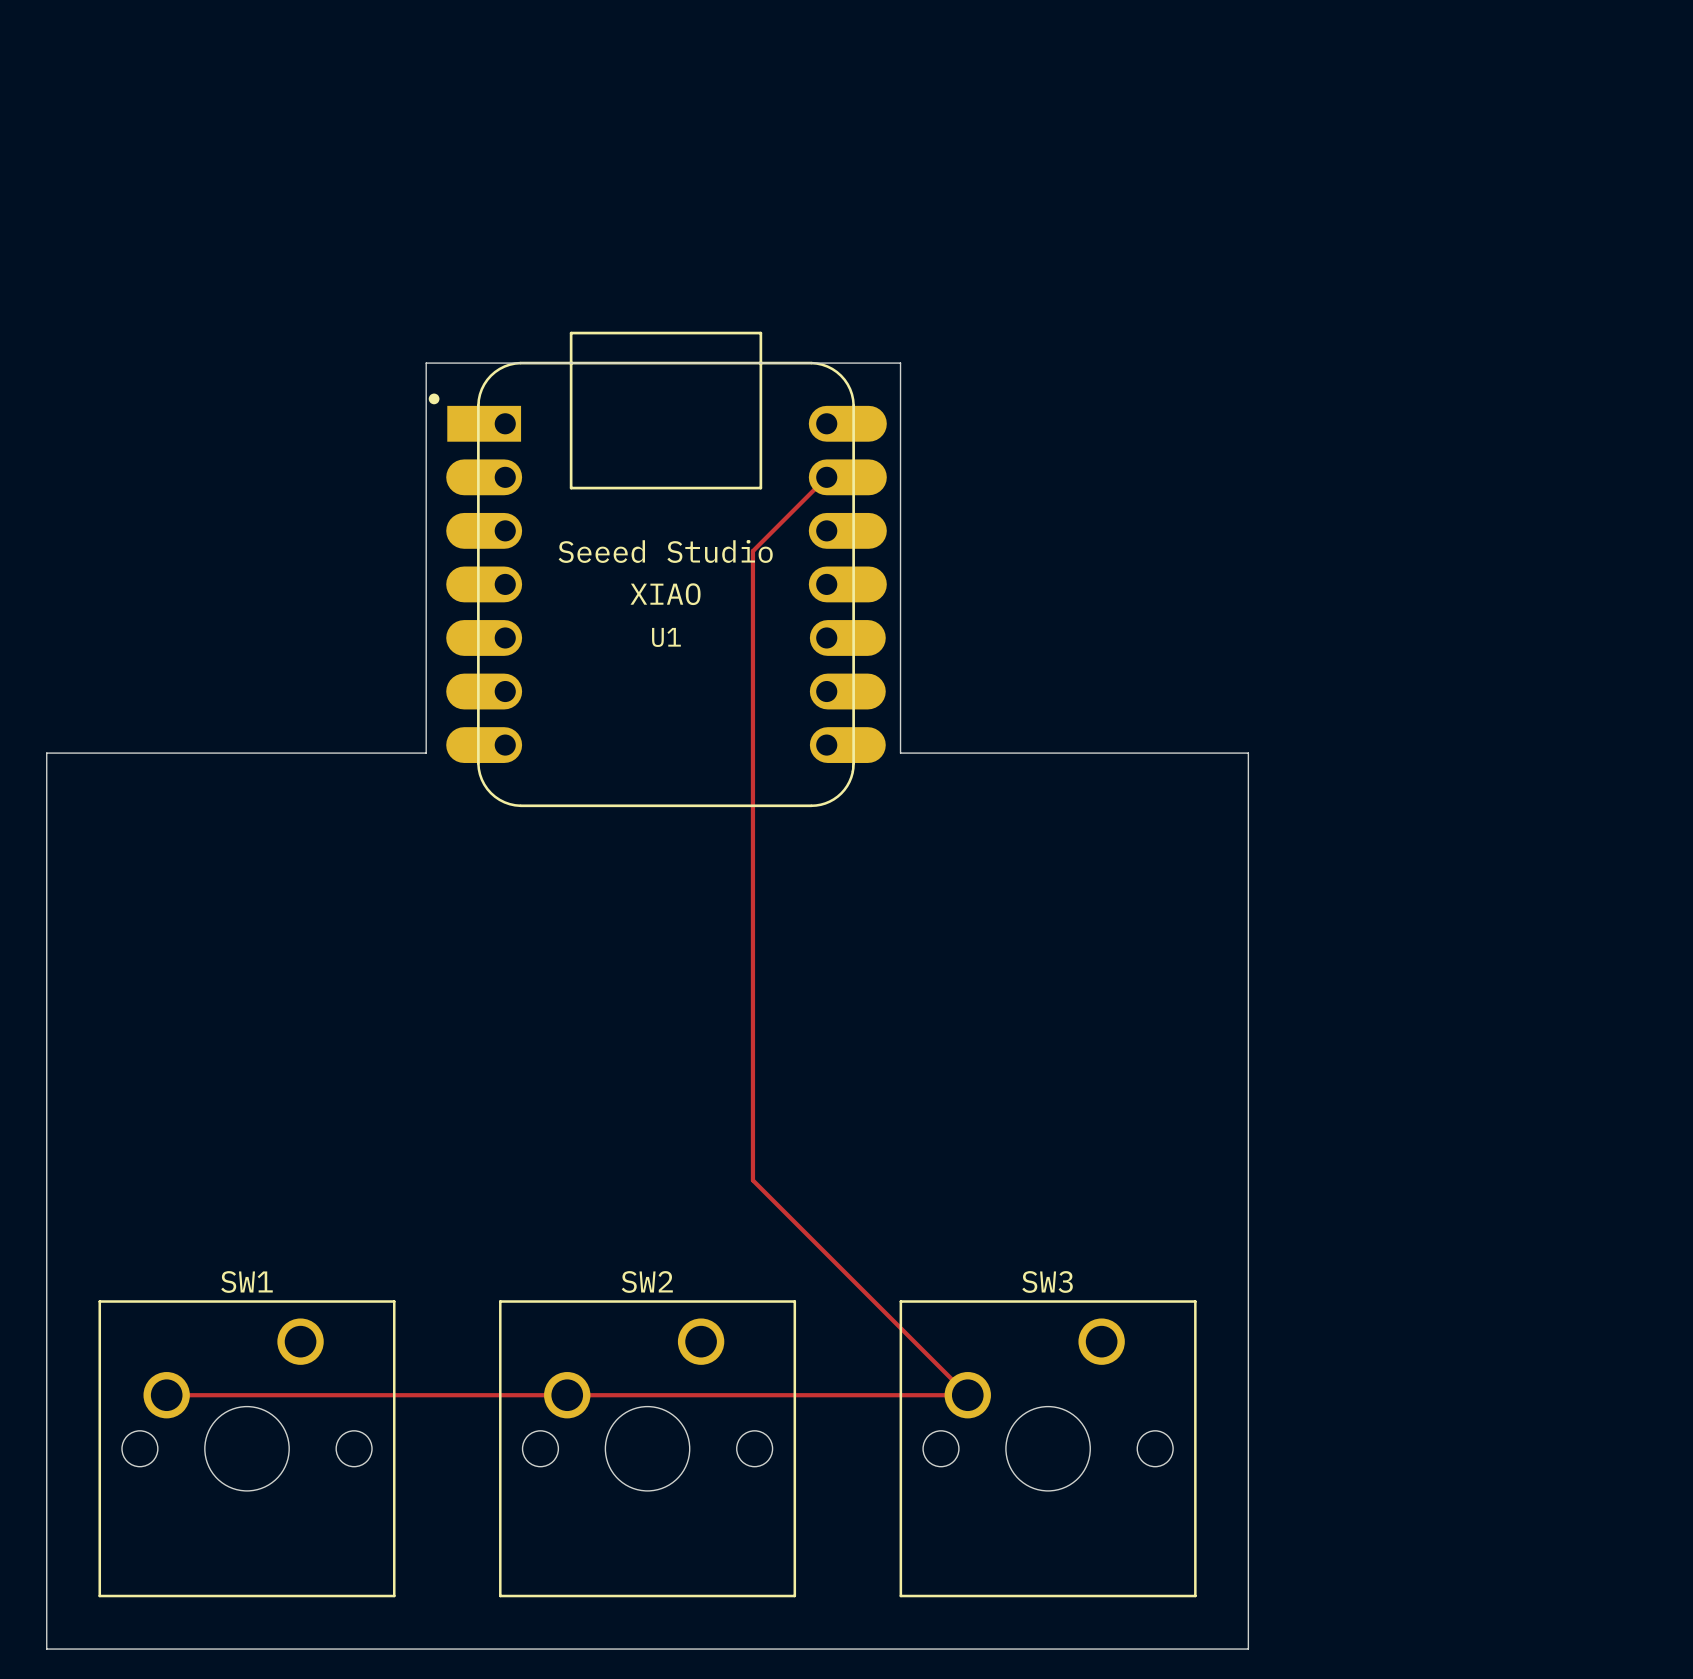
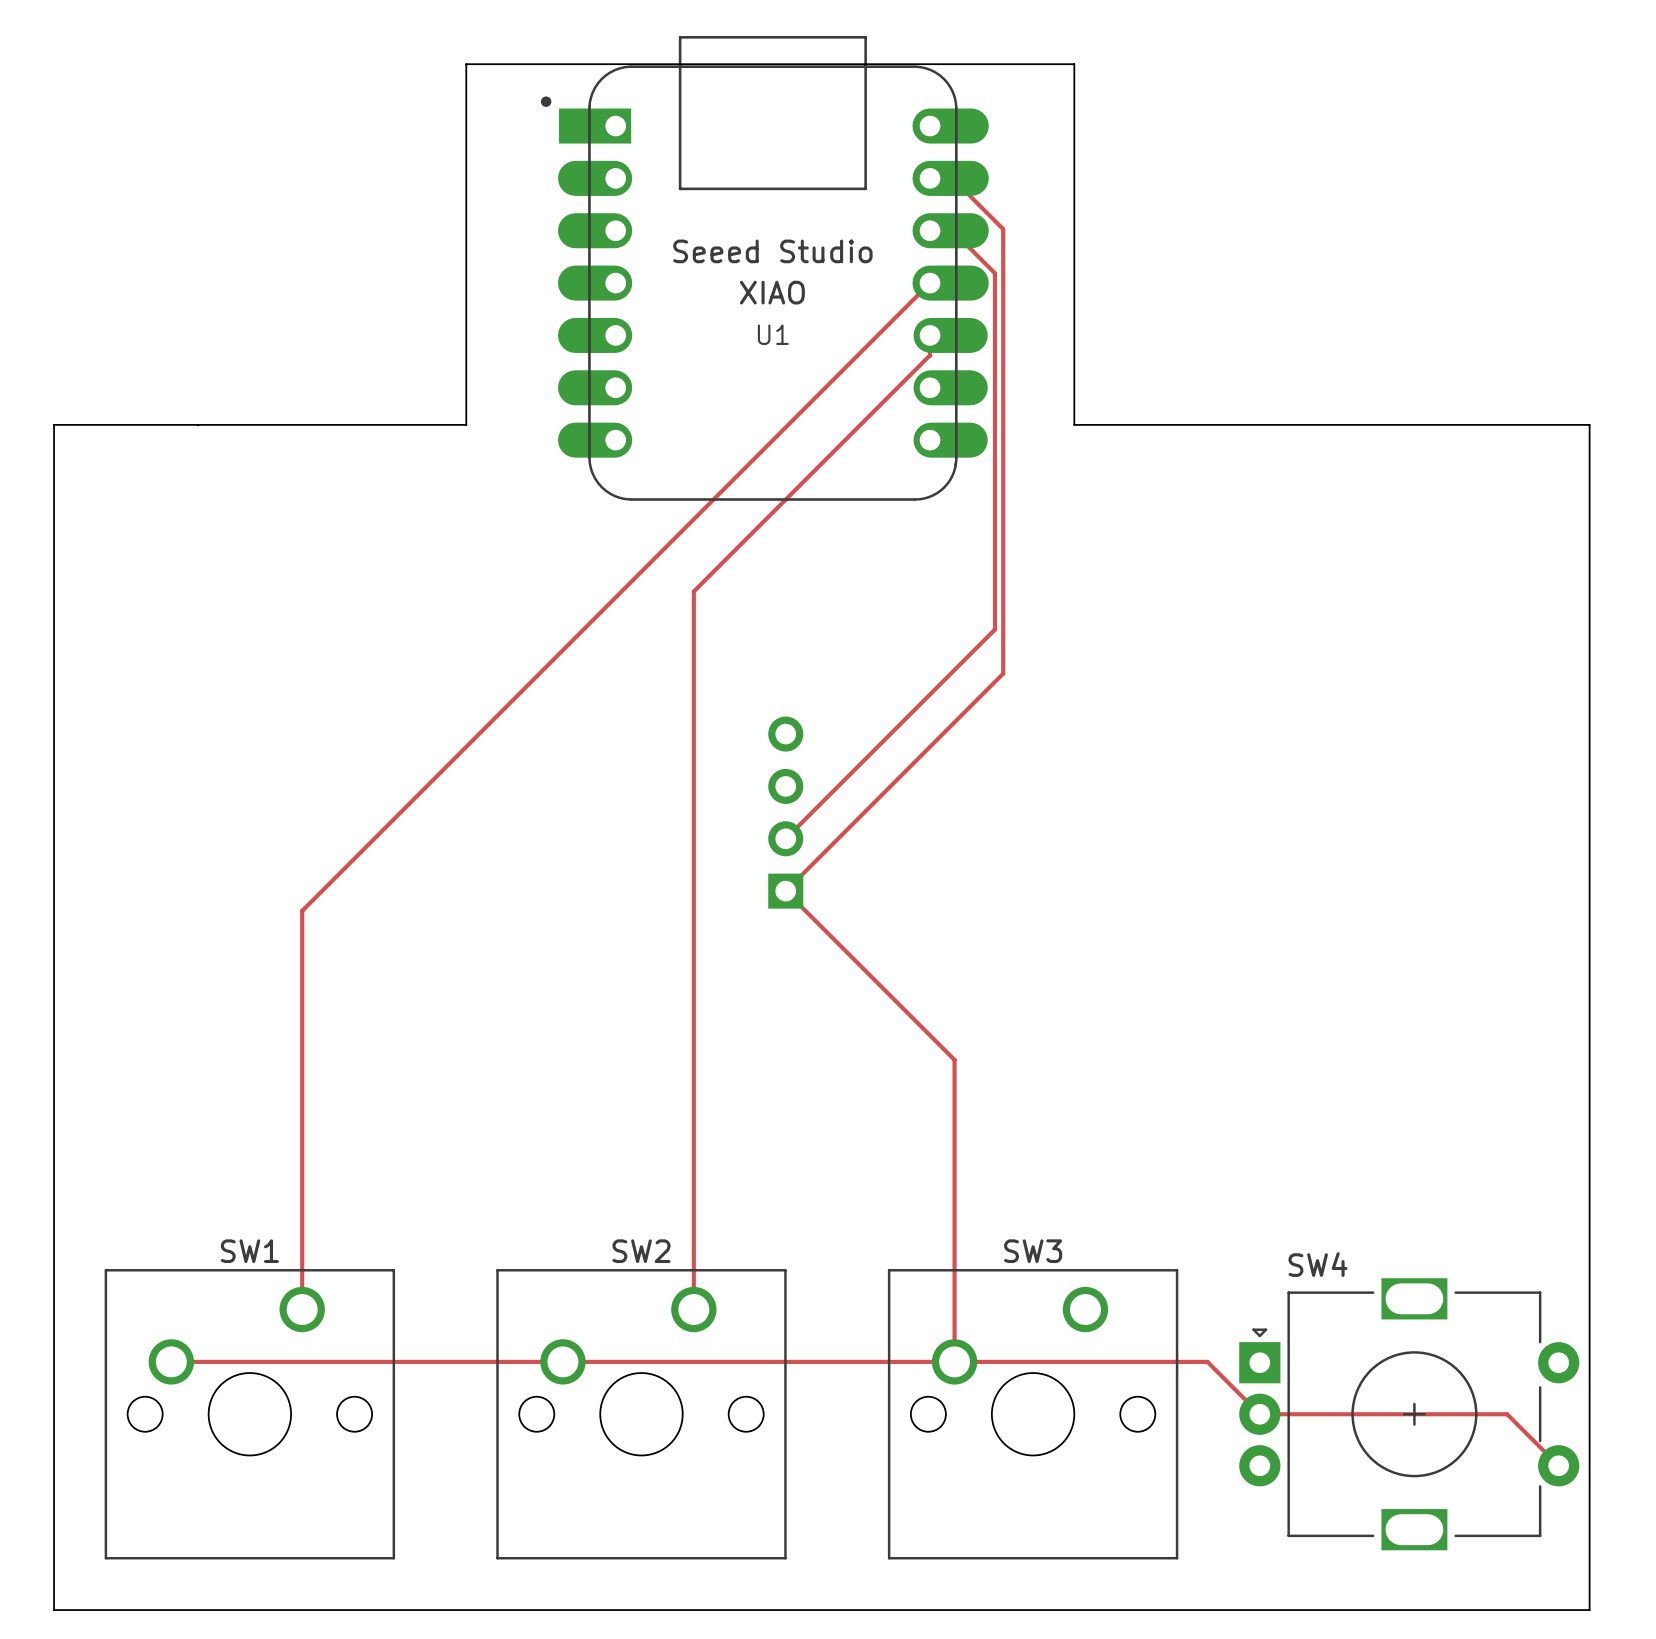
track: none -> (930, 178) (952, 178) (1003, 229) (1003, 673) (785, 891) (954, 1059) (954, 1361) (1207, 1361) (1259, 1414) (1507, 1414) (1558, 1465)
track: none -> (930, 230) (952, 230) (994, 273) (994, 629) (785, 838)
track: none -> (930, 283) (302, 910) (302, 1309)
track: none -> (930, 335) (930, 355) (693, 591) (693, 1309)
track: (826, 477) (752, 551) (752, 1180) (967, 1395) -> none
U1 position: (657, 569) -> (764, 268)
board edge: (46, 753) (426, 753) (426, 363) (900, 363) (900, 753) (1248, 753) (1248, 1649) -> (54, 734) (54, 424) (466, 424) (466, 64) (1074, 64) (1074, 424) (1589, 424) (1589, 1610) (1228, 1610)
part: none -> (785, 812)
SW4: none -> (1409, 1414)

